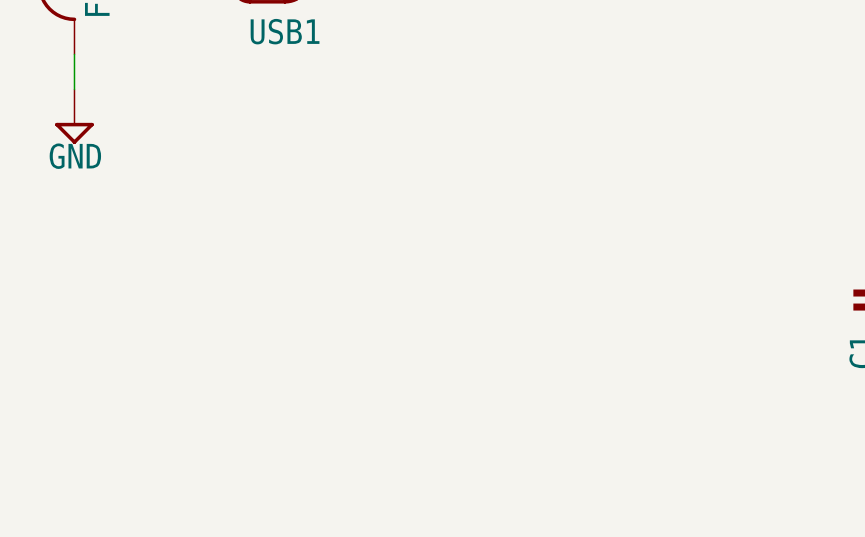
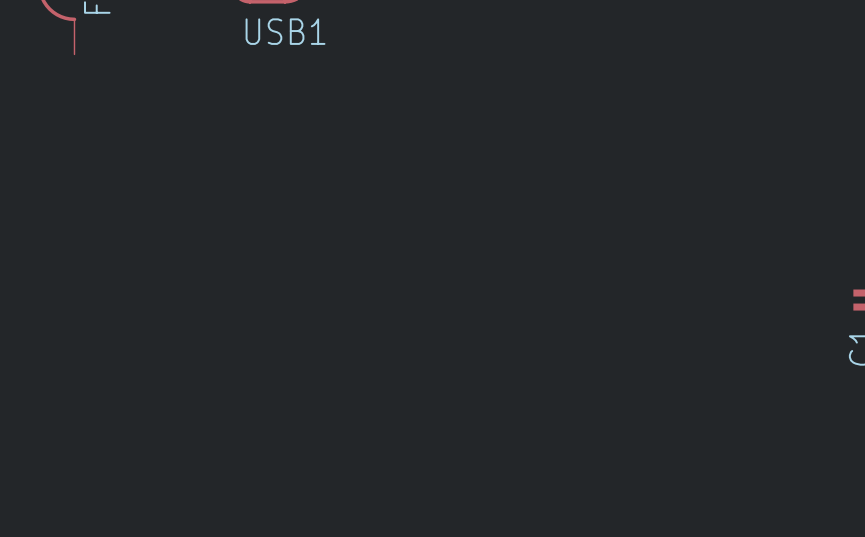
wire: (74, 54) (74, 89) -> none
power symbol: GND (74, 116) -> none

